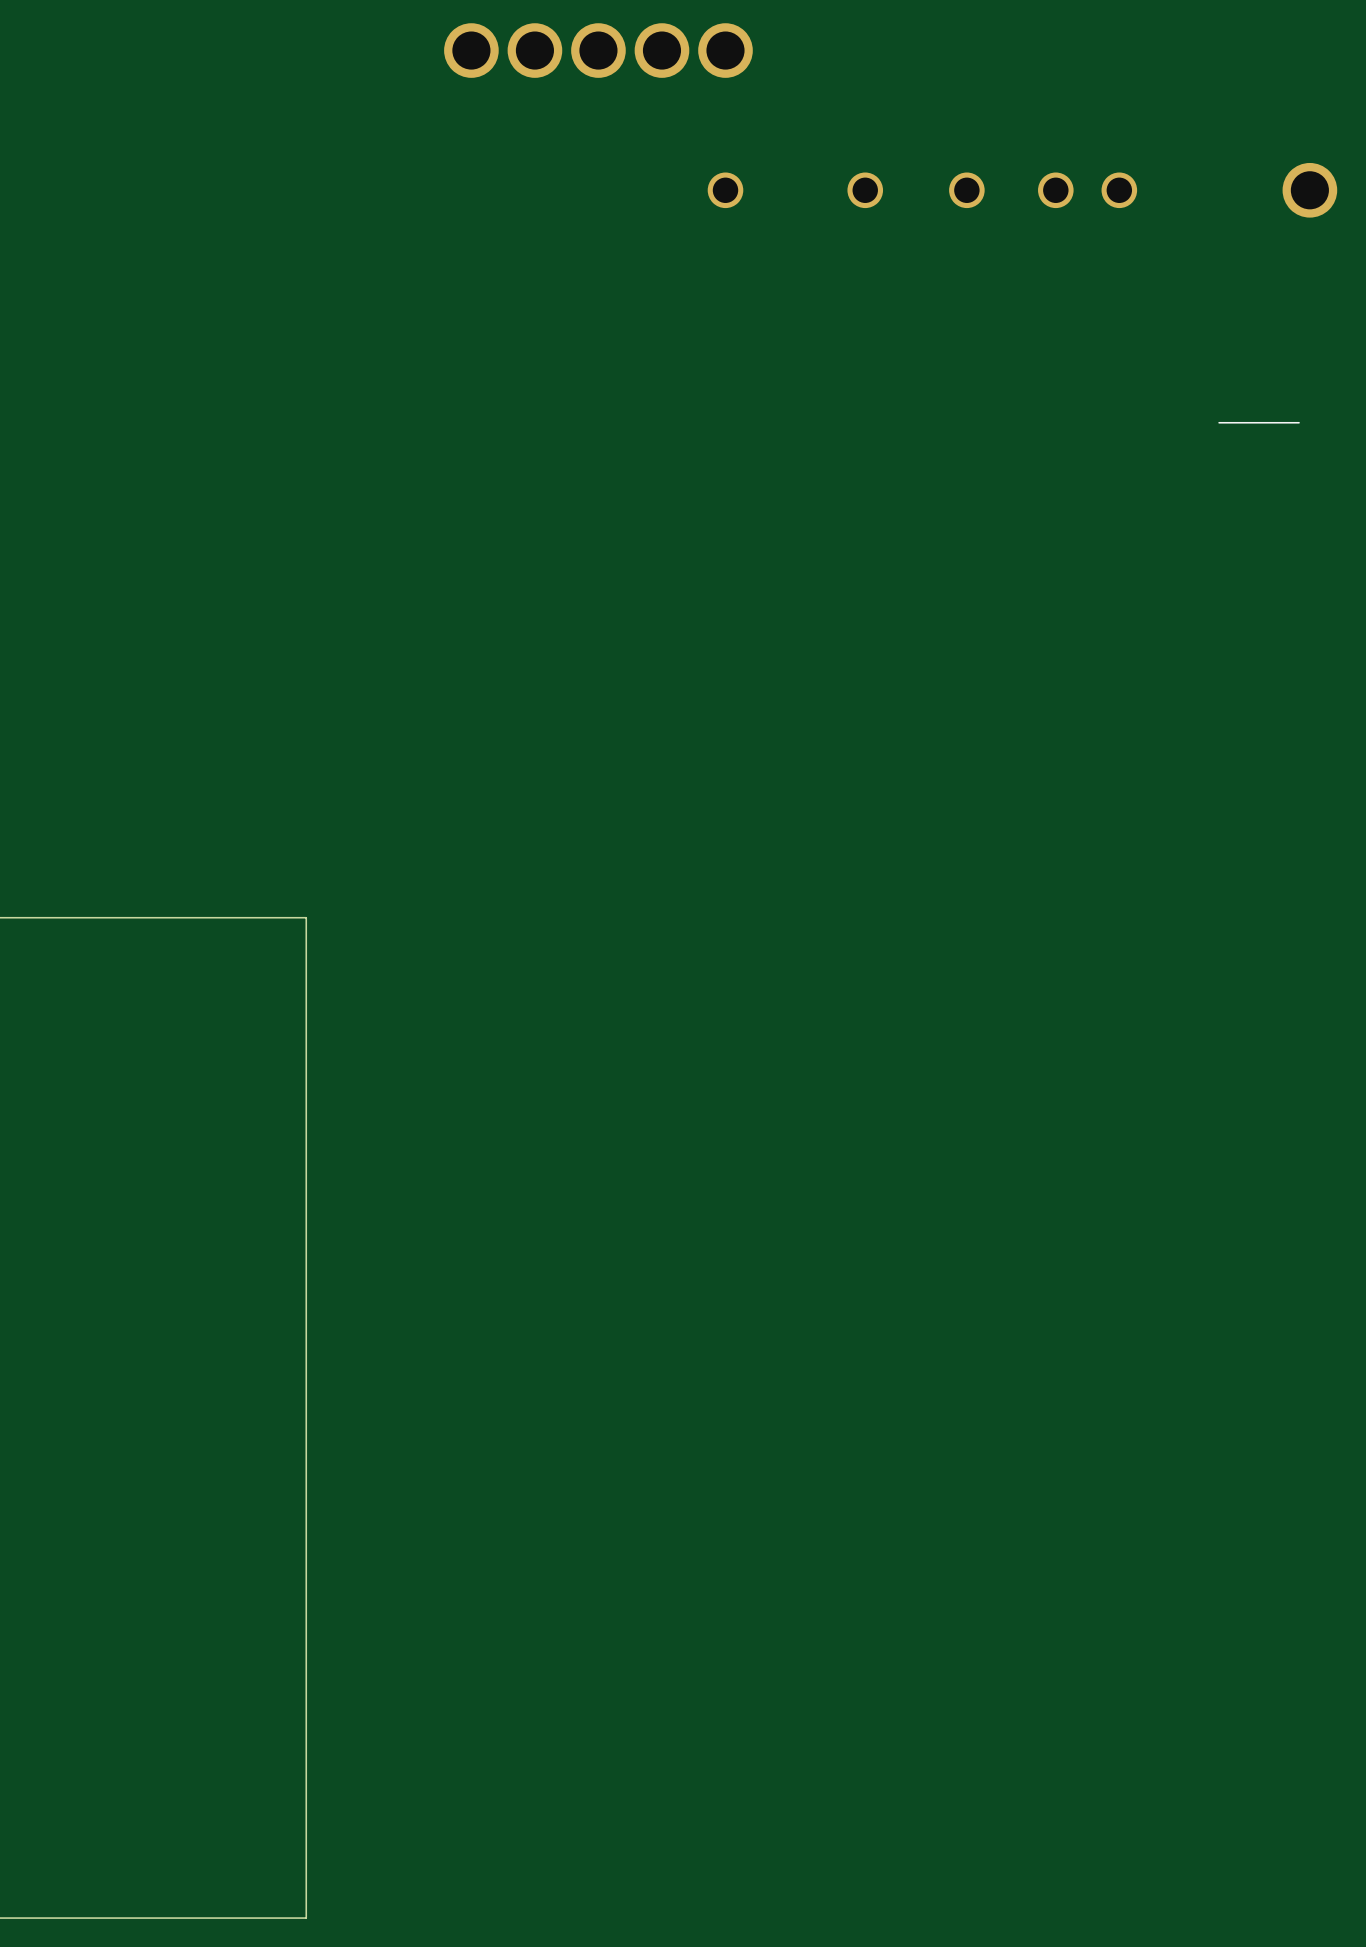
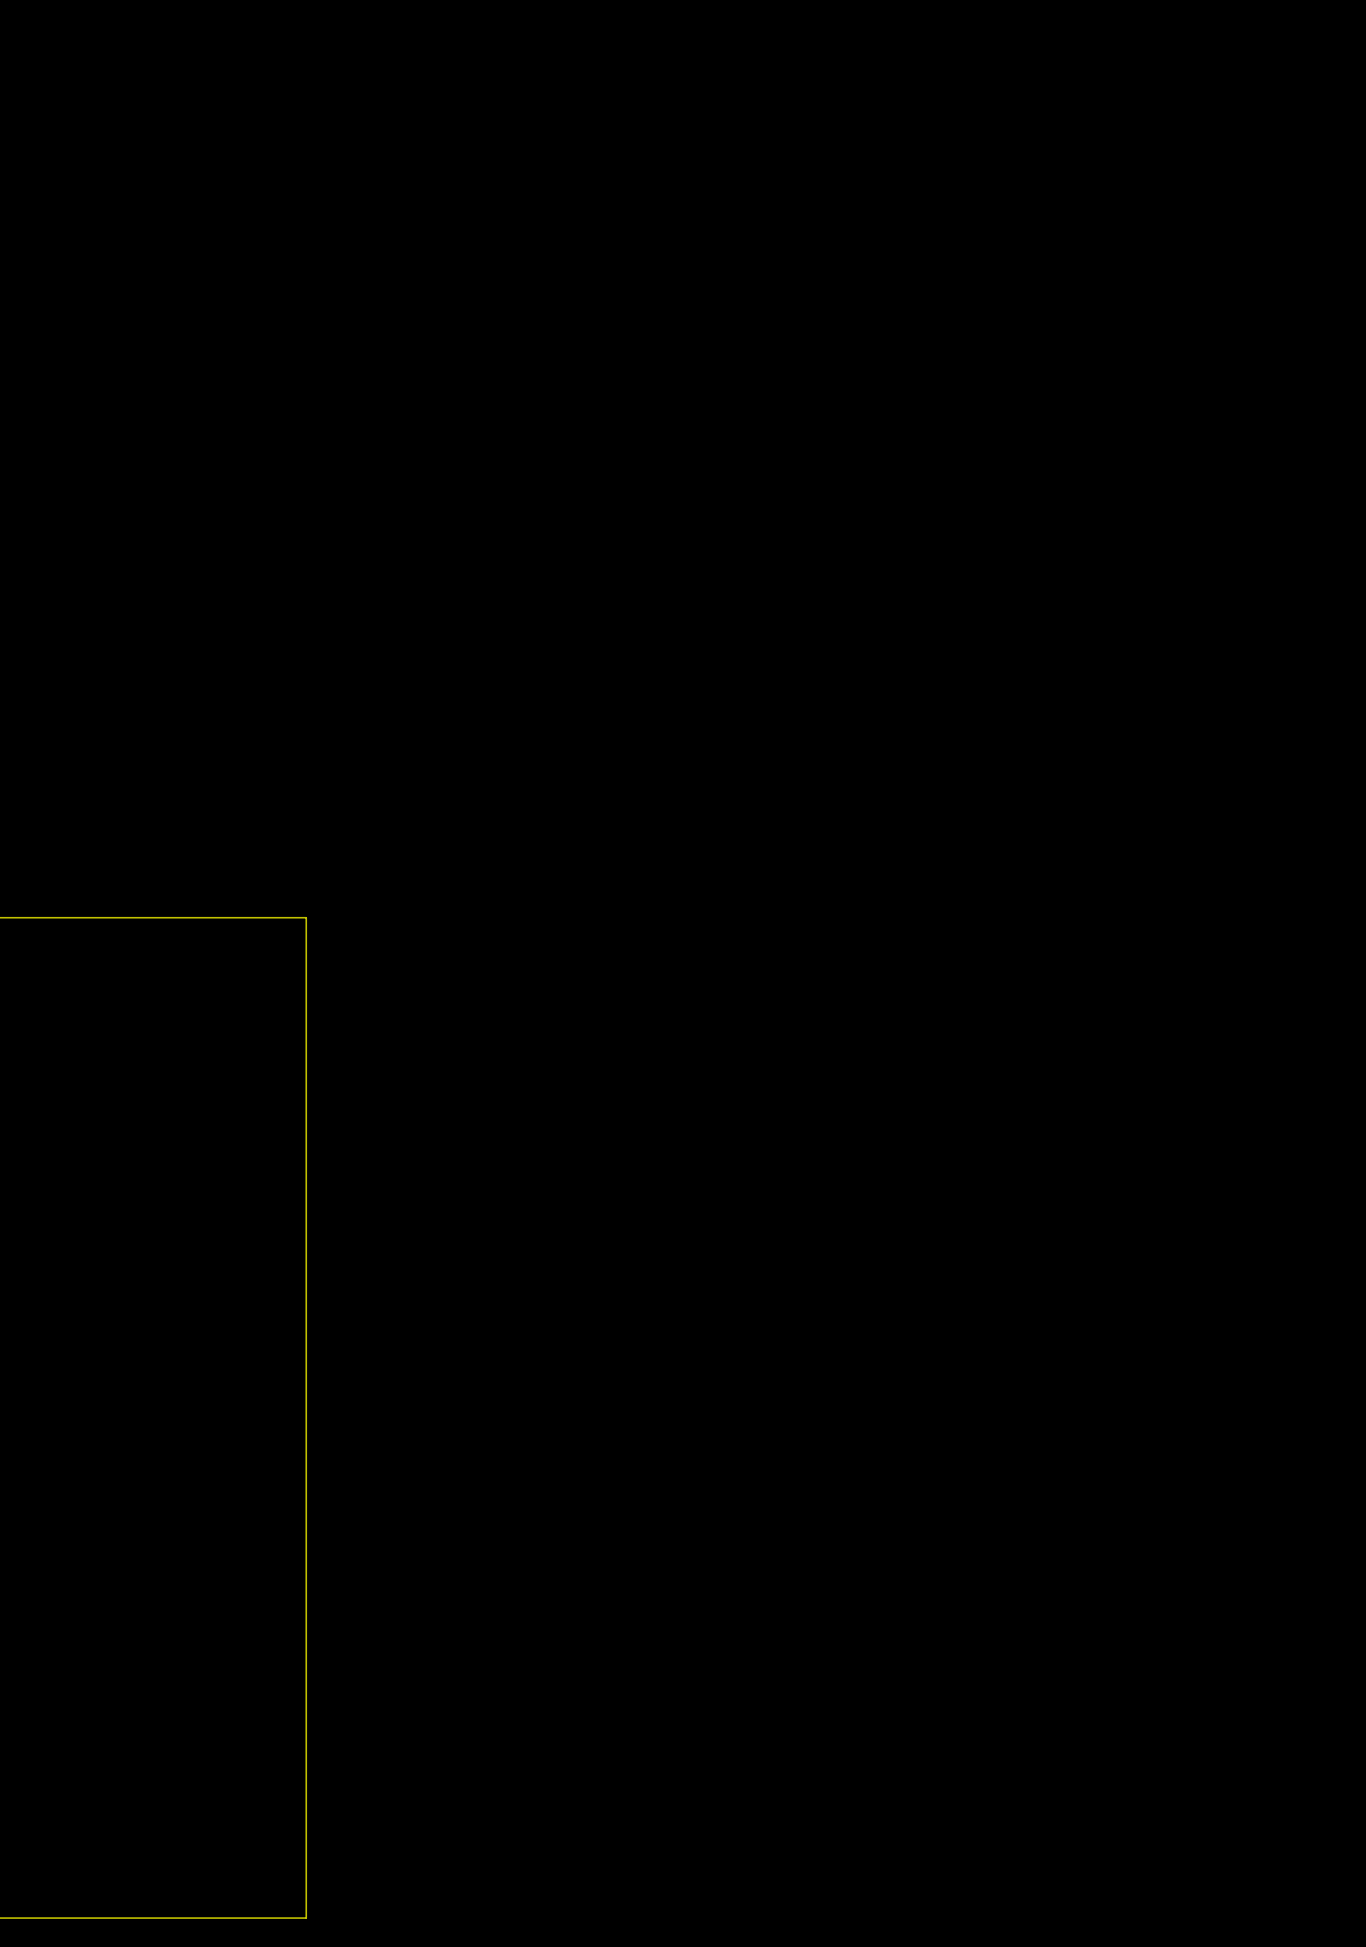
part: (471, 50) -> none
part: (534, 50) -> none
part: (598, 50) -> none
part: (661, 50) -> none
part: (725, 50) -> none
part: (725, 190) -> none
part: (865, 190) -> none
part: (966, 190) -> none
part: (1055, 190) -> none
part: (1119, 190) -> none
part: (1309, 190) -> none
part: (1259, 422) -> none

